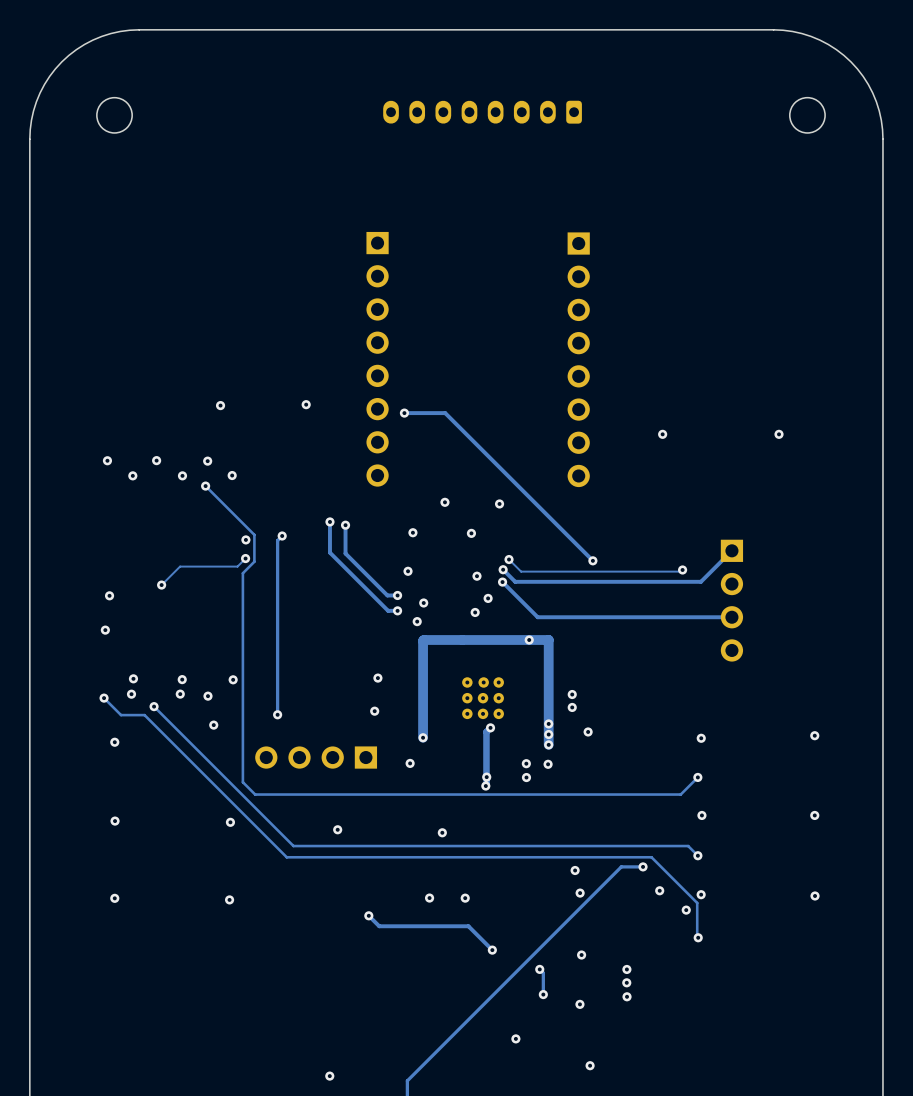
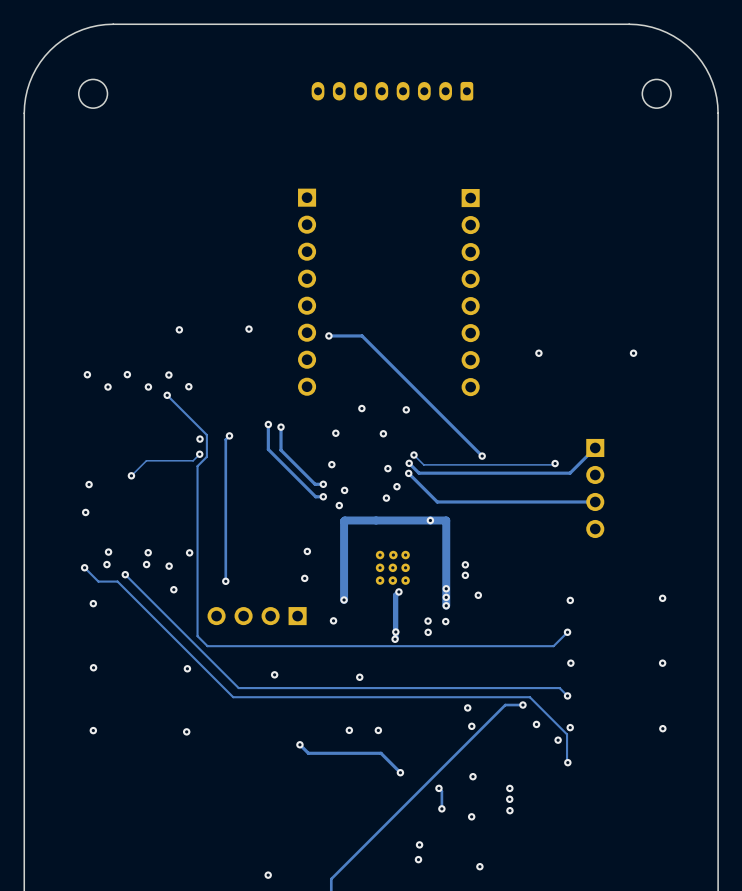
via: none -> (418, 859)

